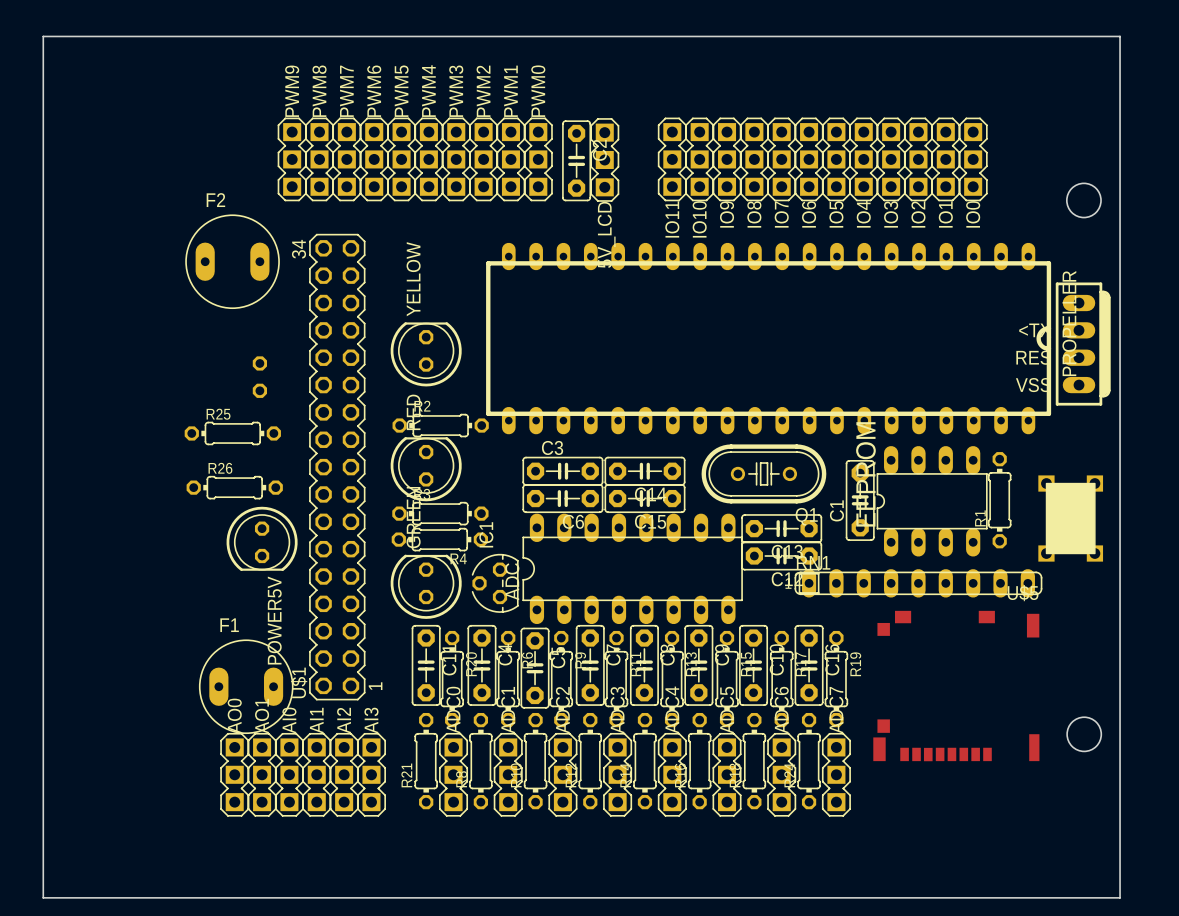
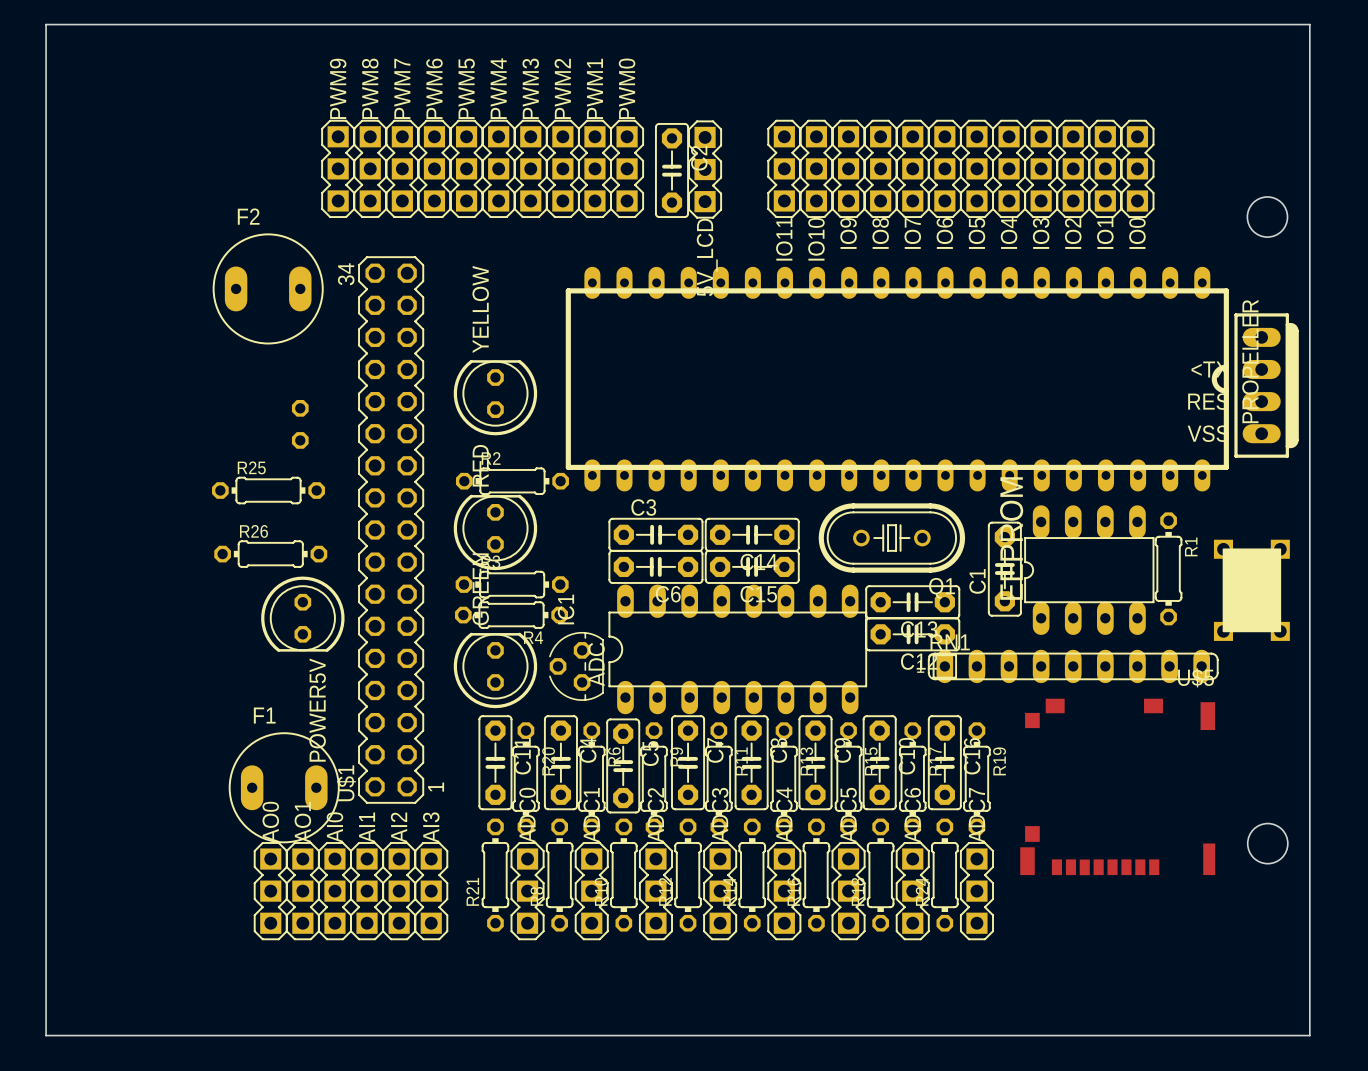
R1 name position: R1 (980, 518) -> R1 (1191, 546)

